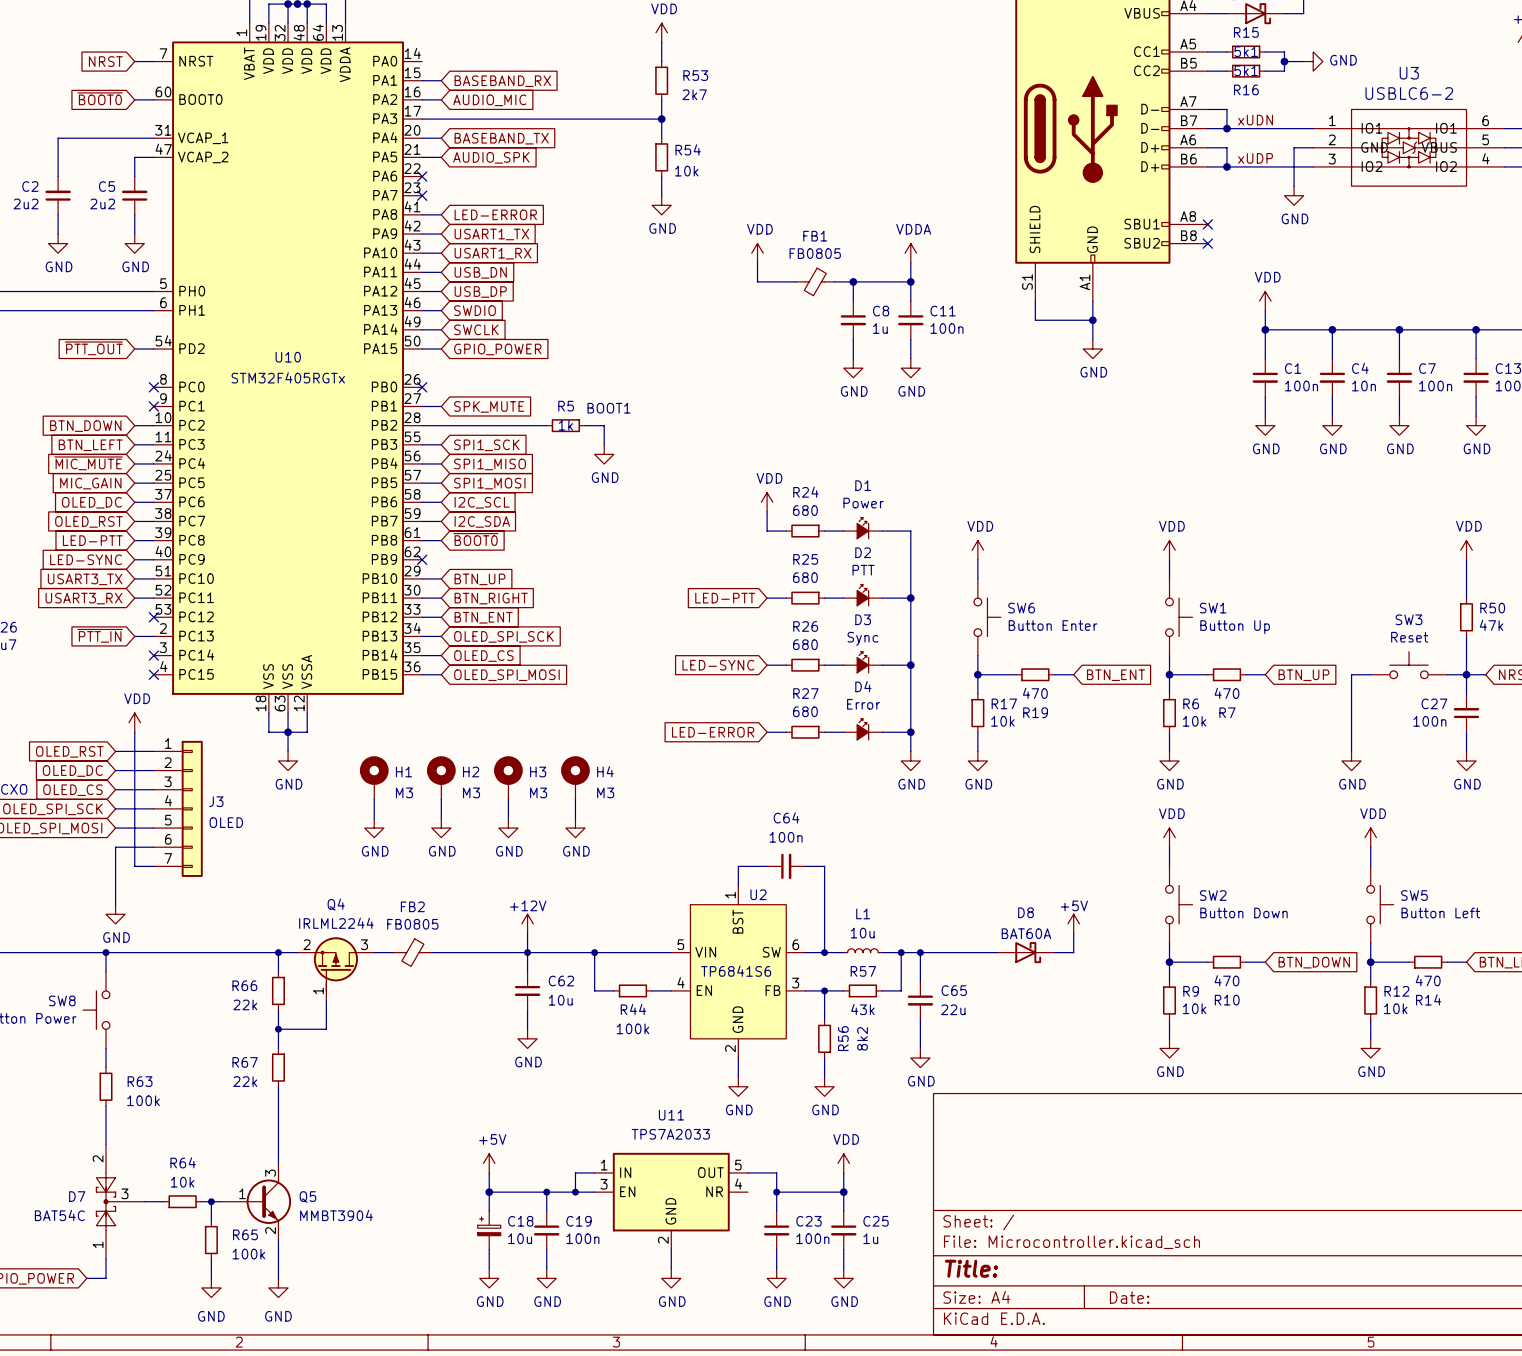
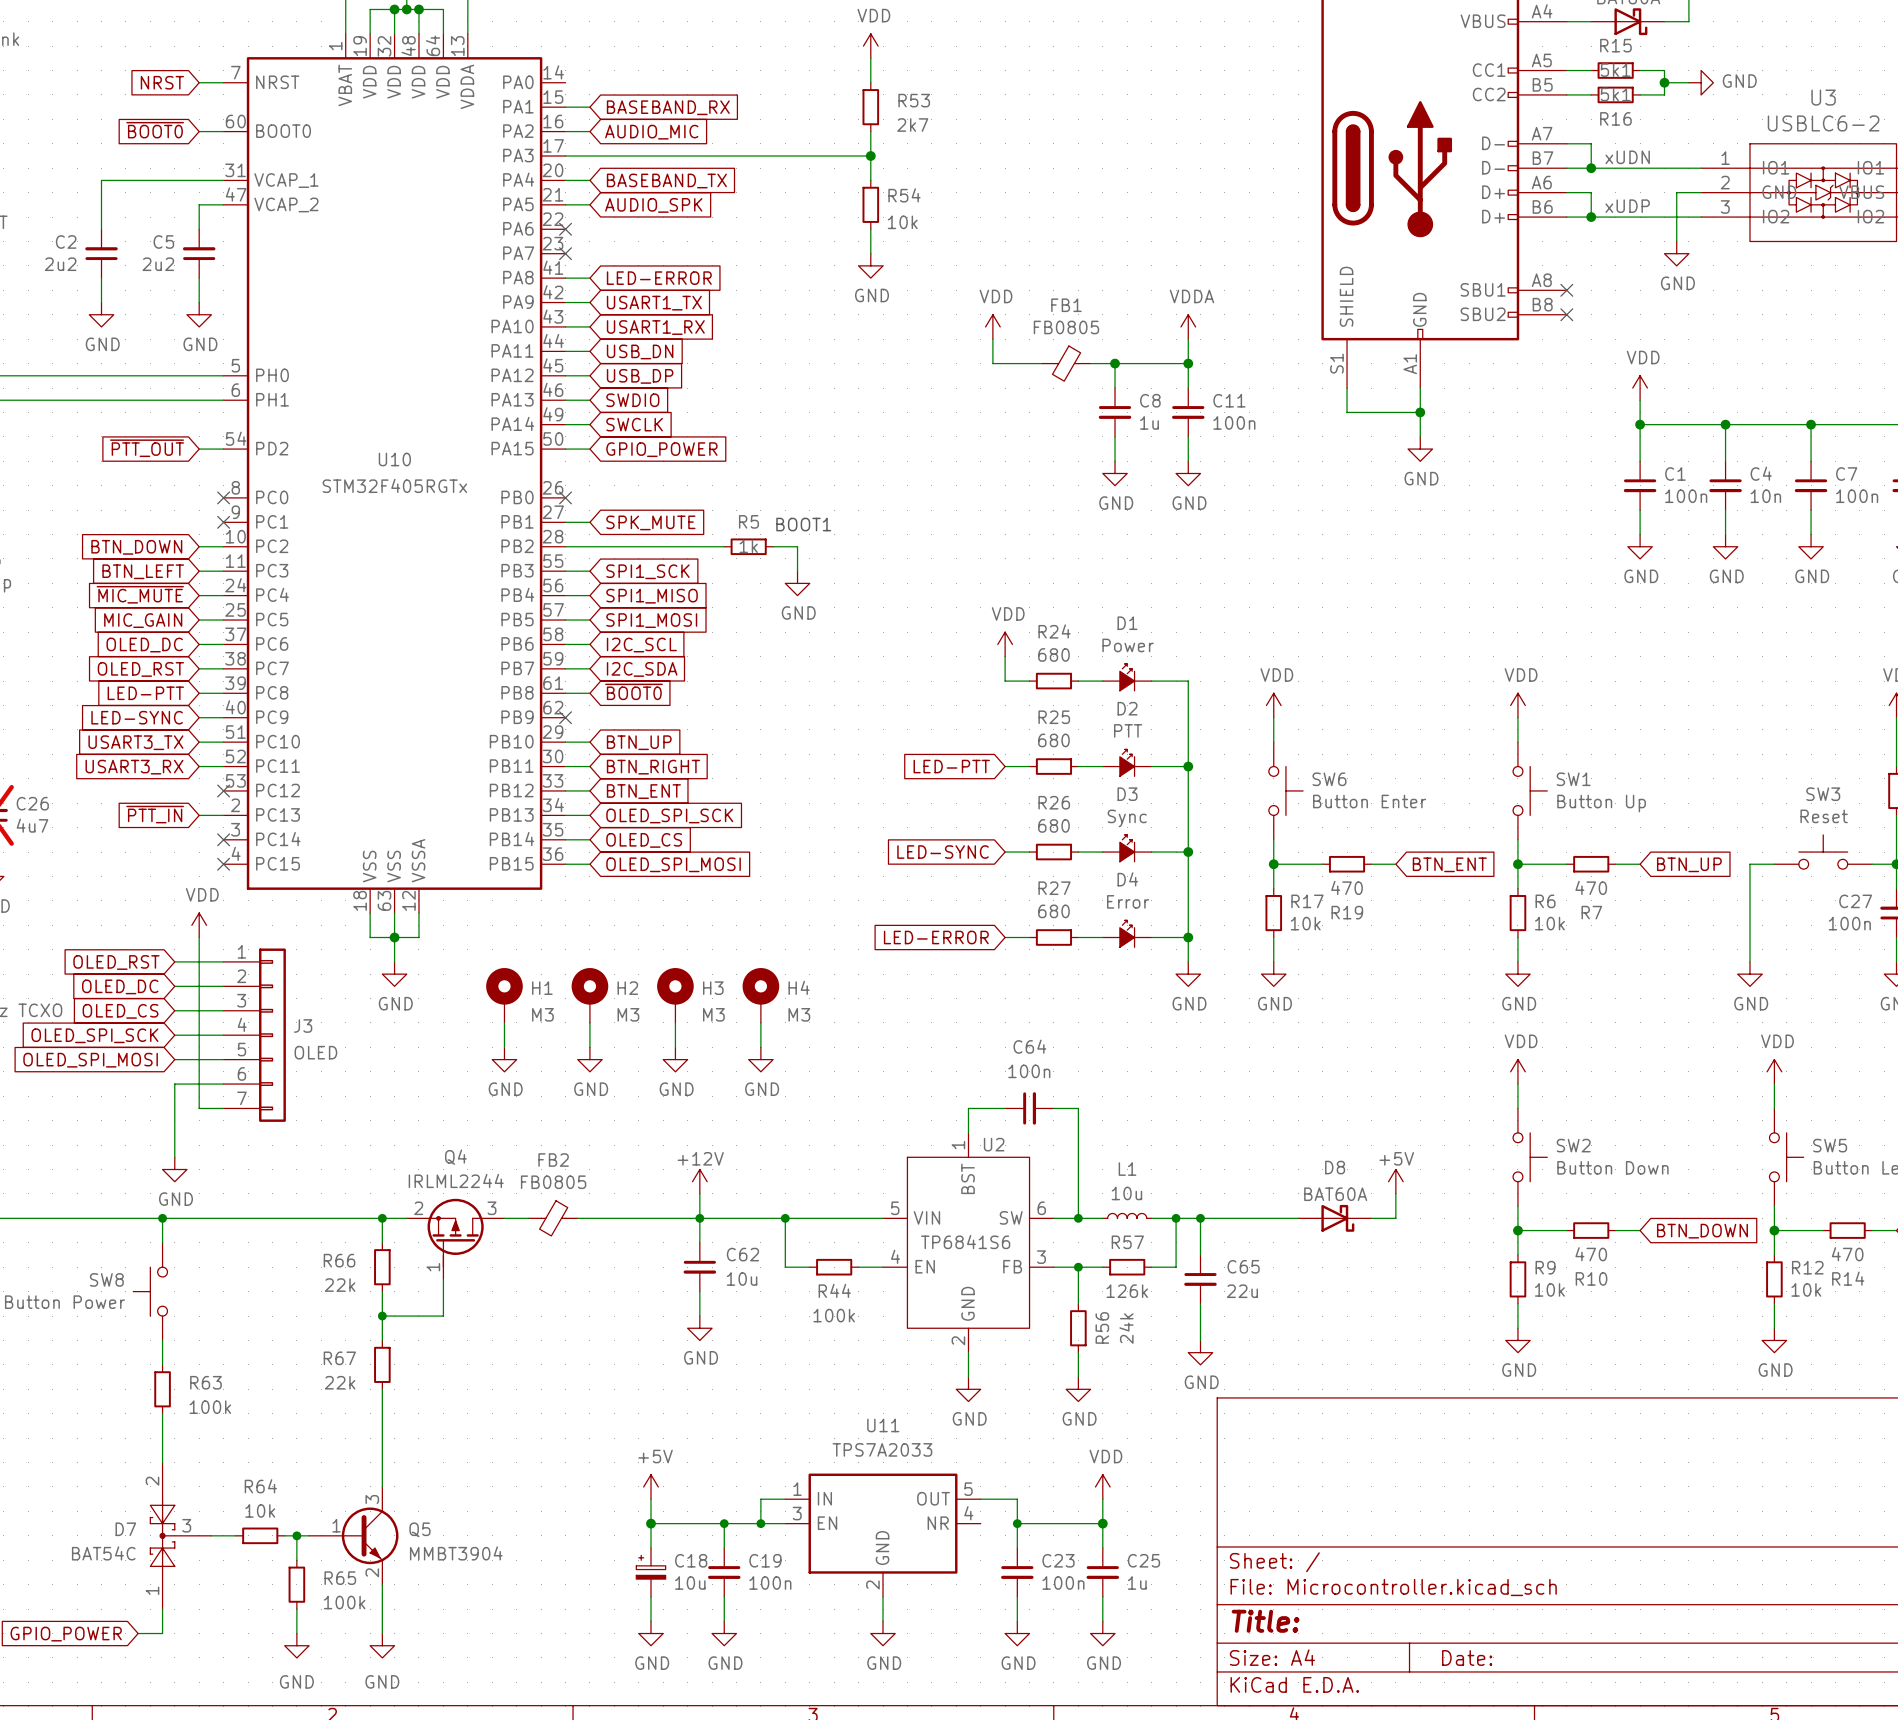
R57 value: 43k (862, 1009) -> 126k (1127, 1291)
R56 value: 8k2 (862, 1038) -> 24k (1126, 1328)

